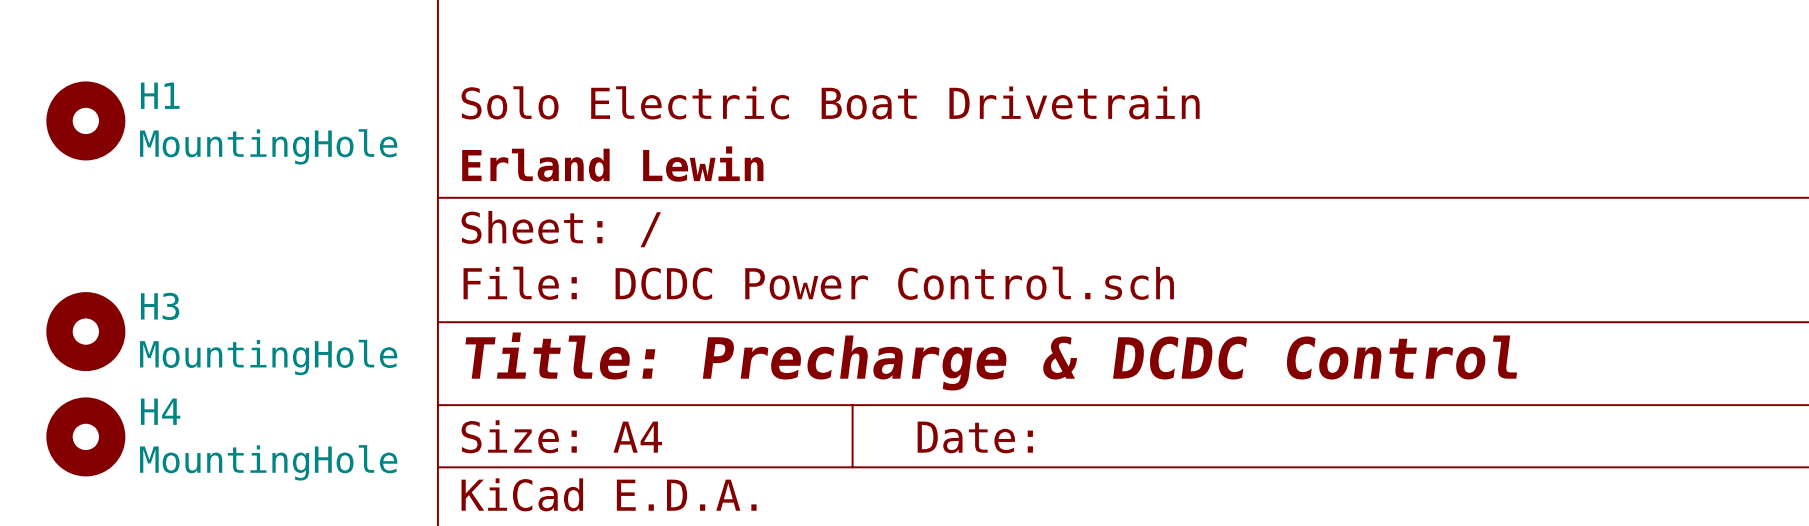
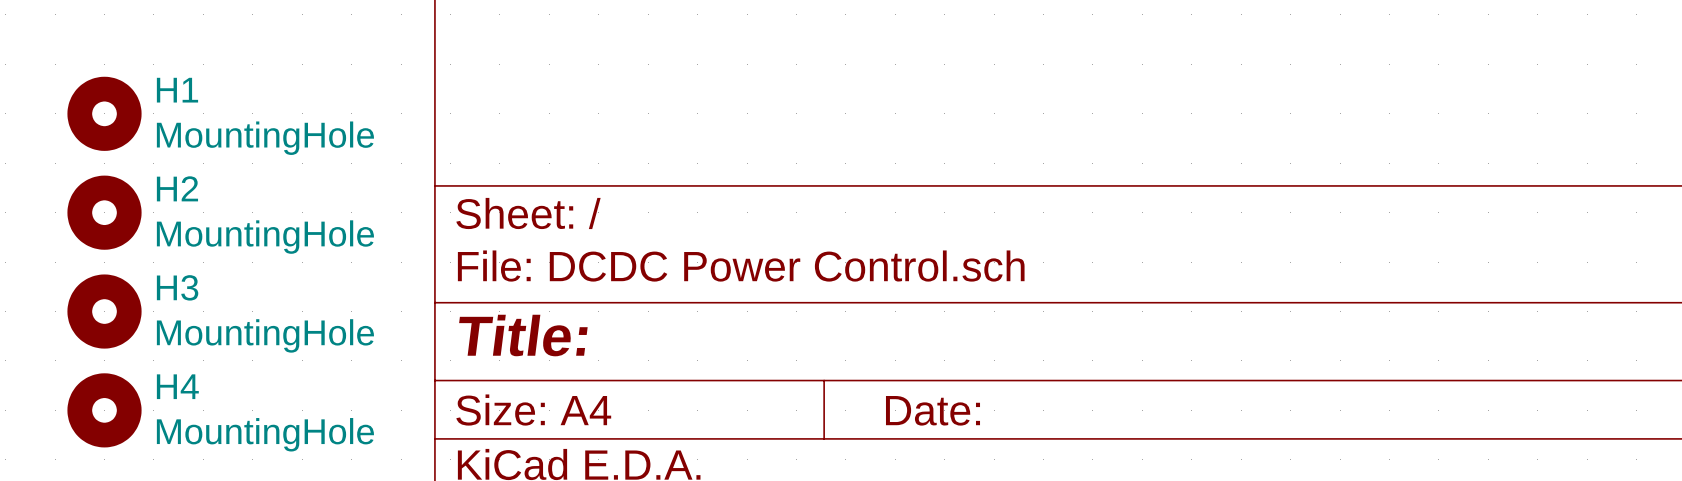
title block: Solo Electric Boat Drivetrain (830, 102) -> none
title block: Erland Lewin (612, 164) -> none
H2: none -> MountingHole (104, 212)
title block: Title: Precharge & DCDC Control (991, 361) -> Title: (523, 335)

